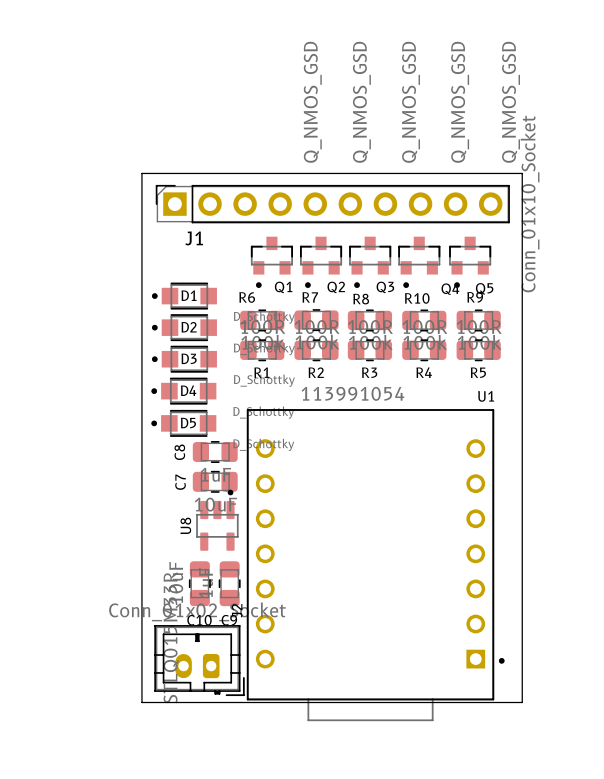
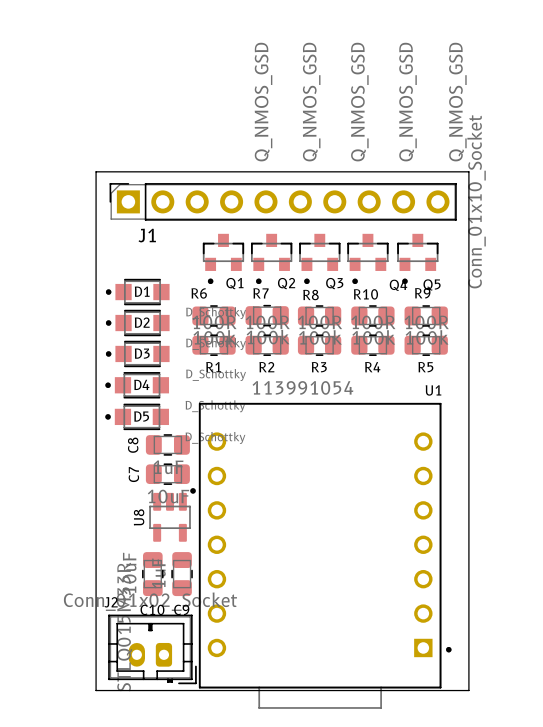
U8 footprint: [196, 489, 239, 551] -> [149, 488, 196, 542]
J2 name rotation: 0° (237, 610) -> 90° clockwise (111, 602)
J2 name position: J2 (237, 610) -> J2 (111, 602)

